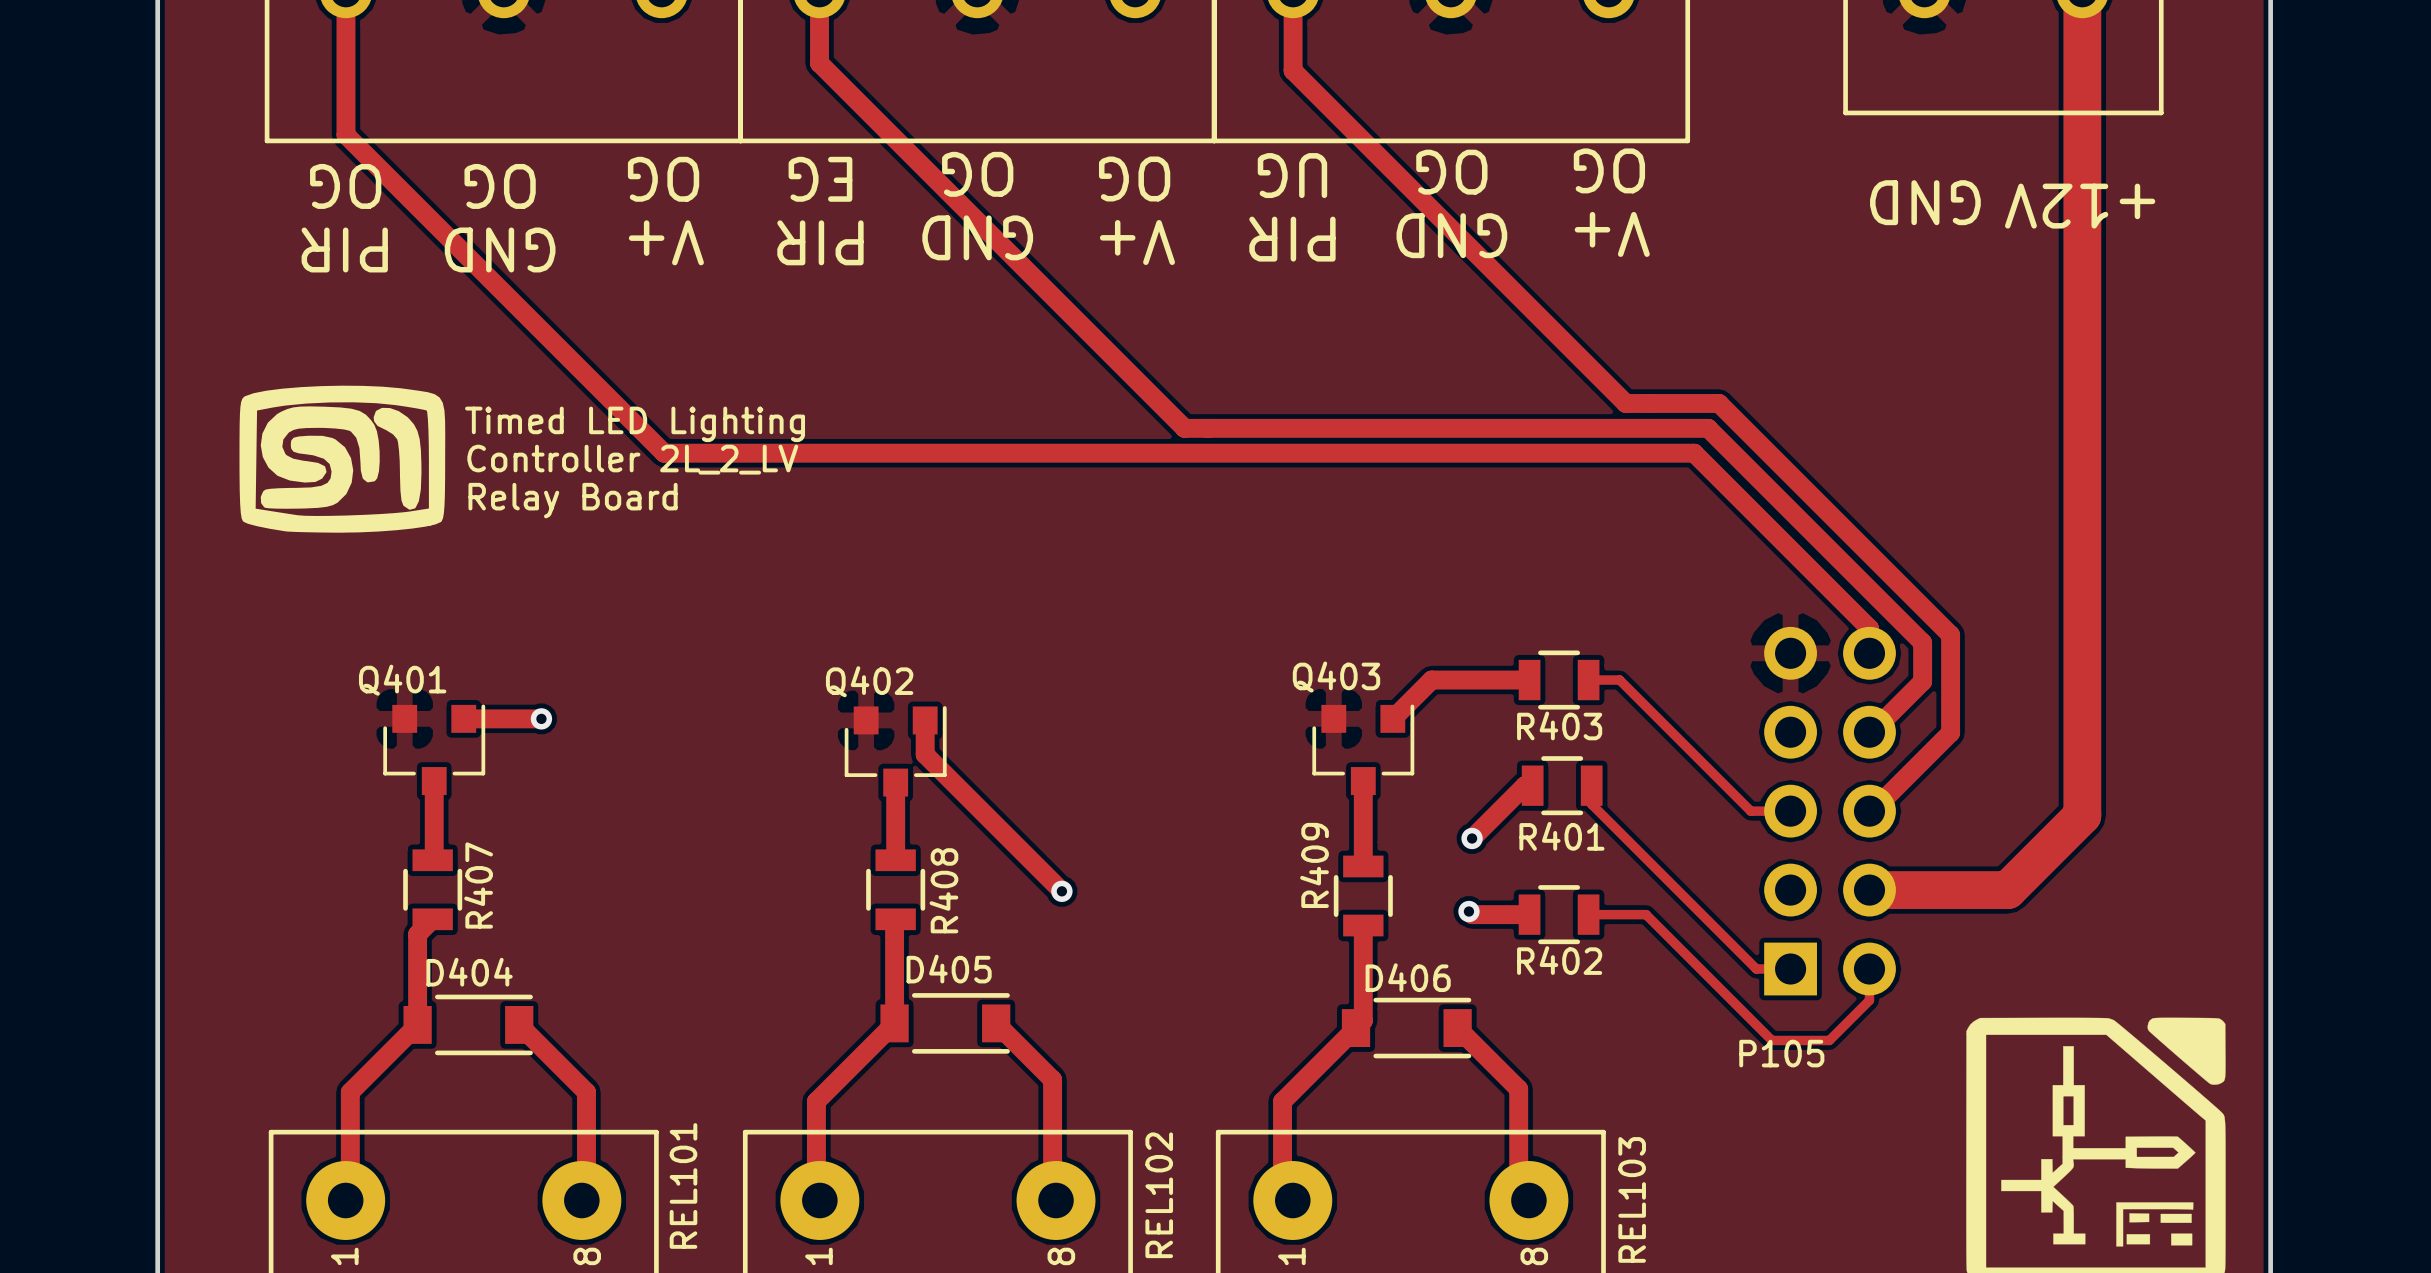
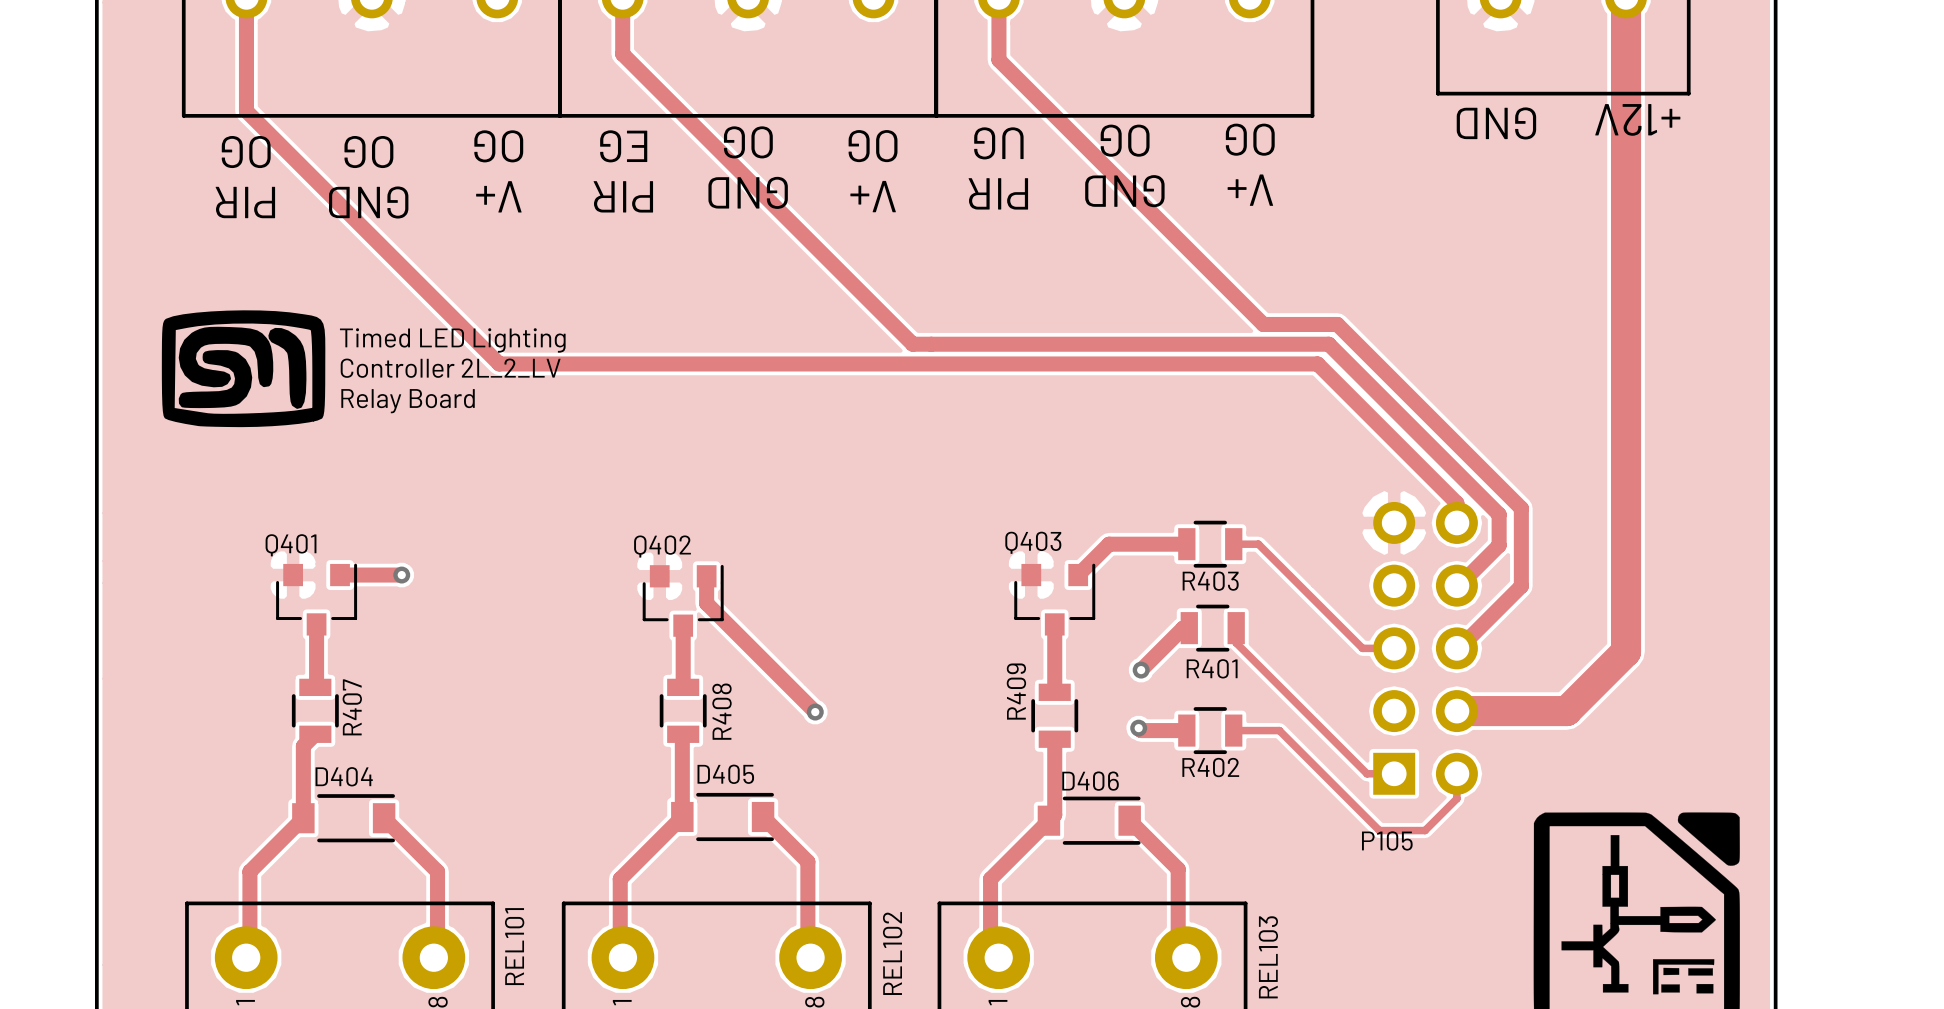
text position: GND (1925, 202) -> GND (1496, 123)
text position: +12V (2080, 206) -> +12V (1637, 119)

